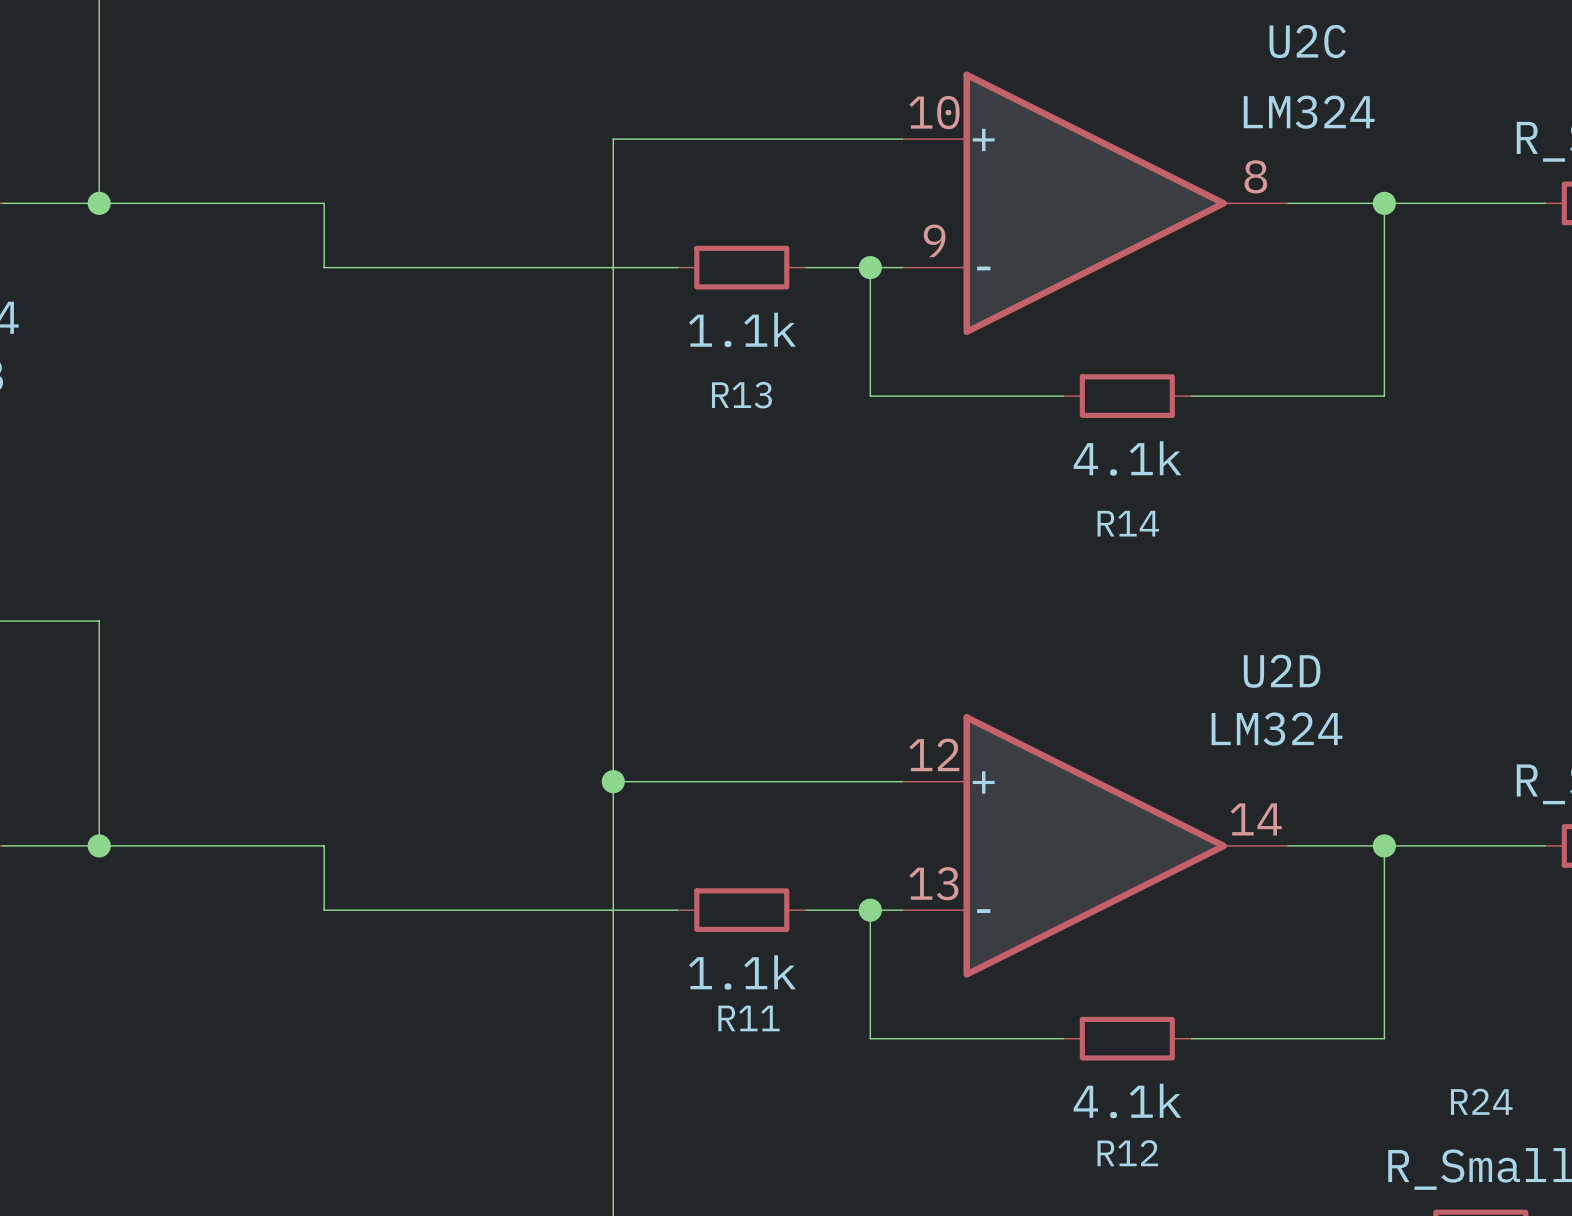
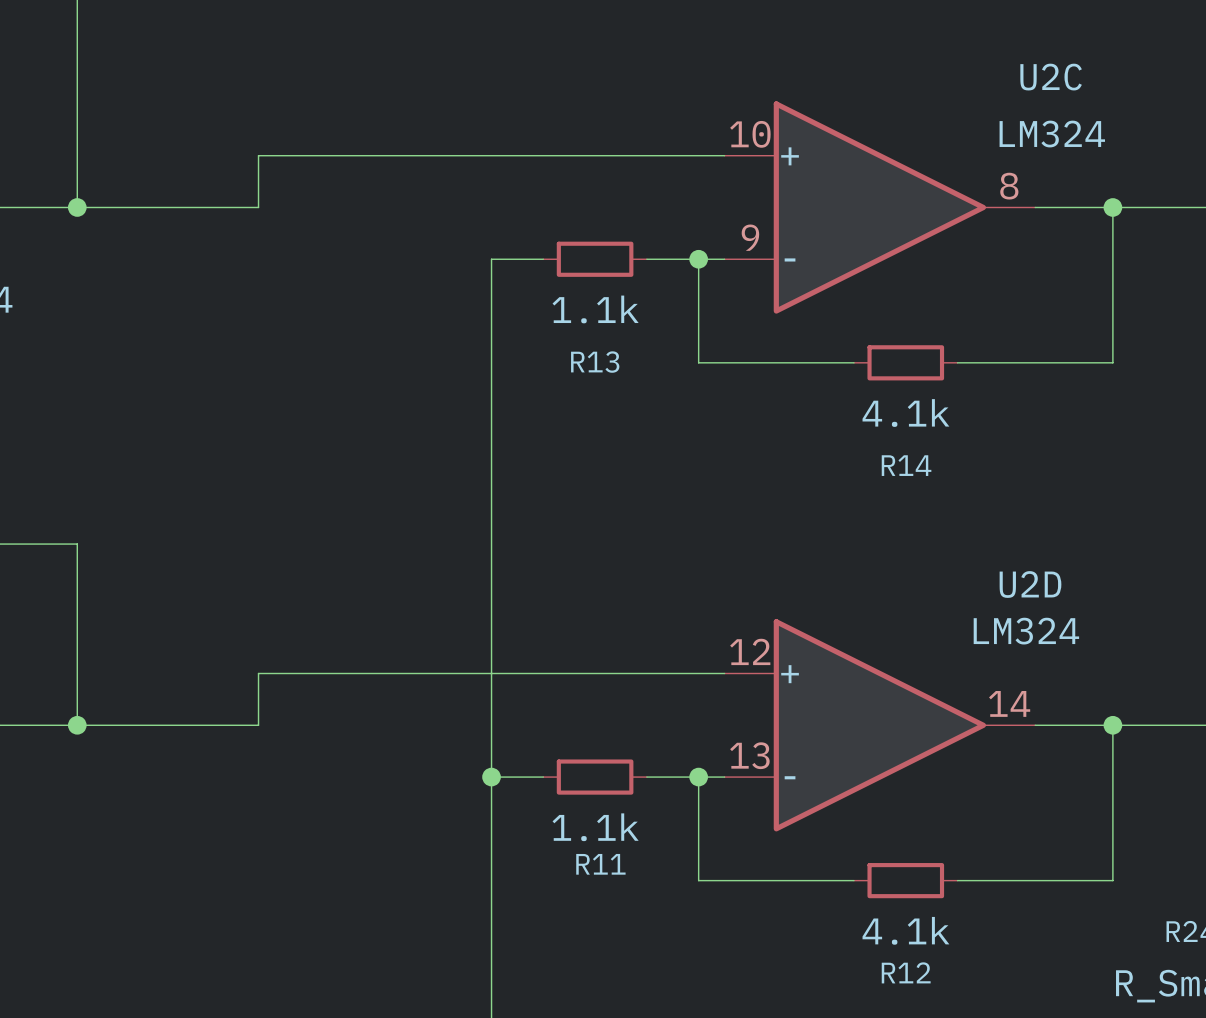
wire: (613, 139) (613, 267) (324, 267) (324, 203) -> (491, 155) (258, 155) (258, 207)
junction position: (613, 781) -> (491, 777)
wire: (324, 845) (324, 910) (613, 910) -> (258, 725) (258, 673) (491, 673)

